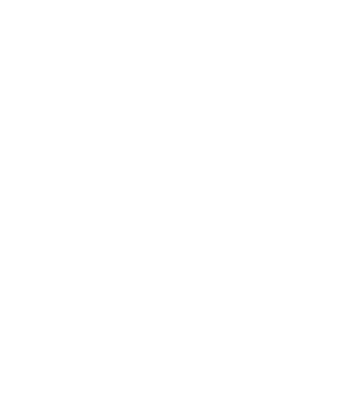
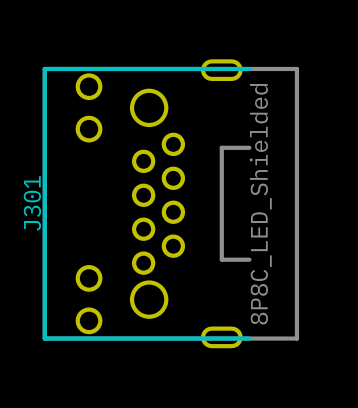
J301: none -> 8P8C_LED_Shielded (170, 203)

